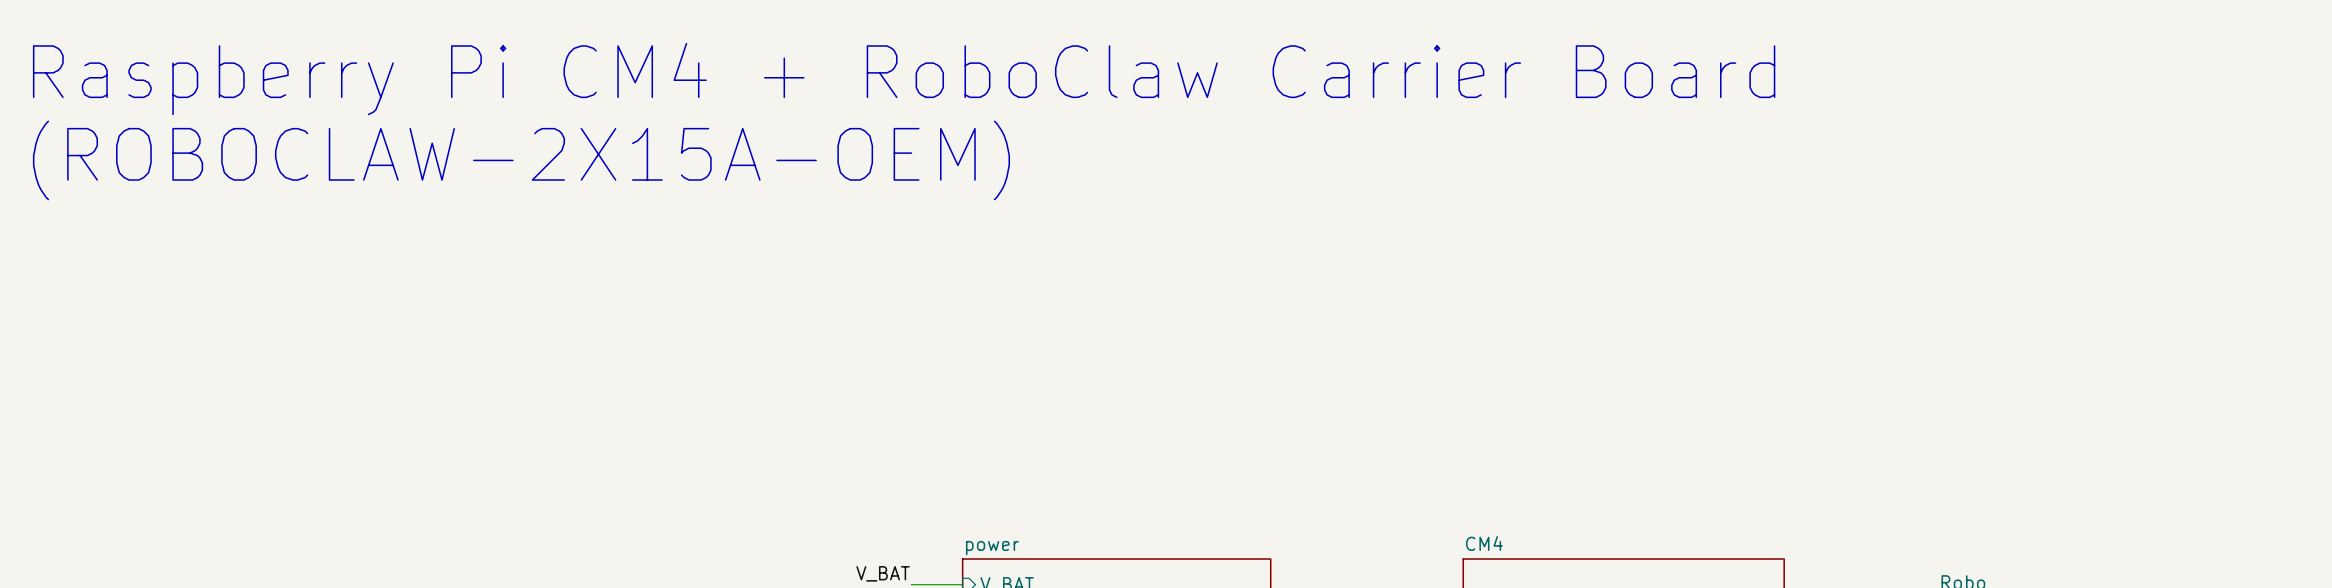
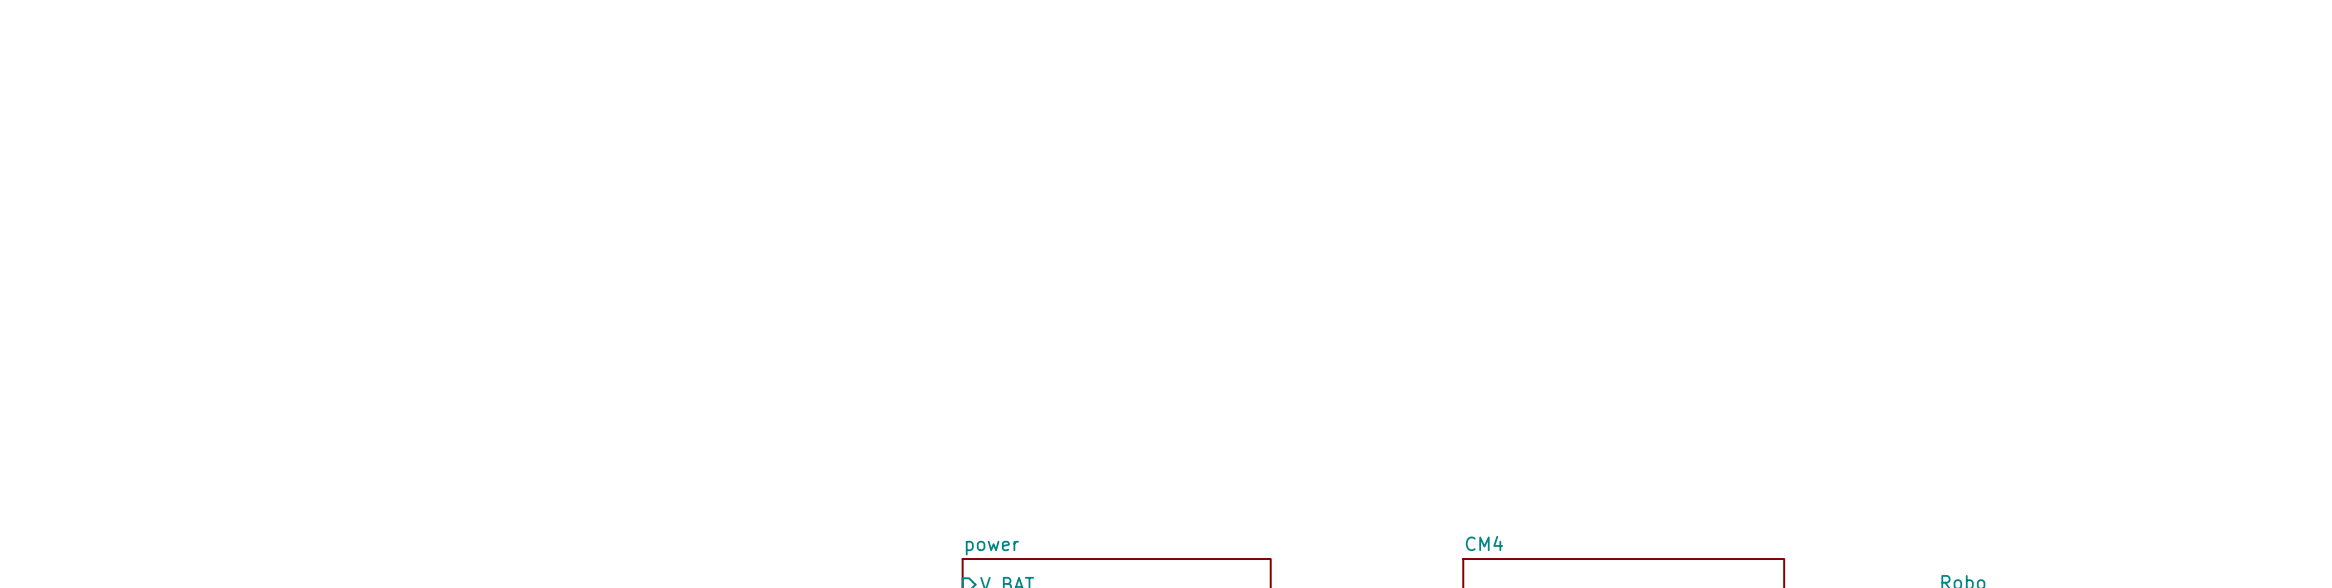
text: Raspberry Pi CM4 + RoboClaw Carrier Board (904, 78) -> none
text: (ROBOCLAW-2X15A-OEM) (521, 160) -> none
label: V_BAT (883, 573) -> none
wire: (911, 584) (962, 584) -> none

